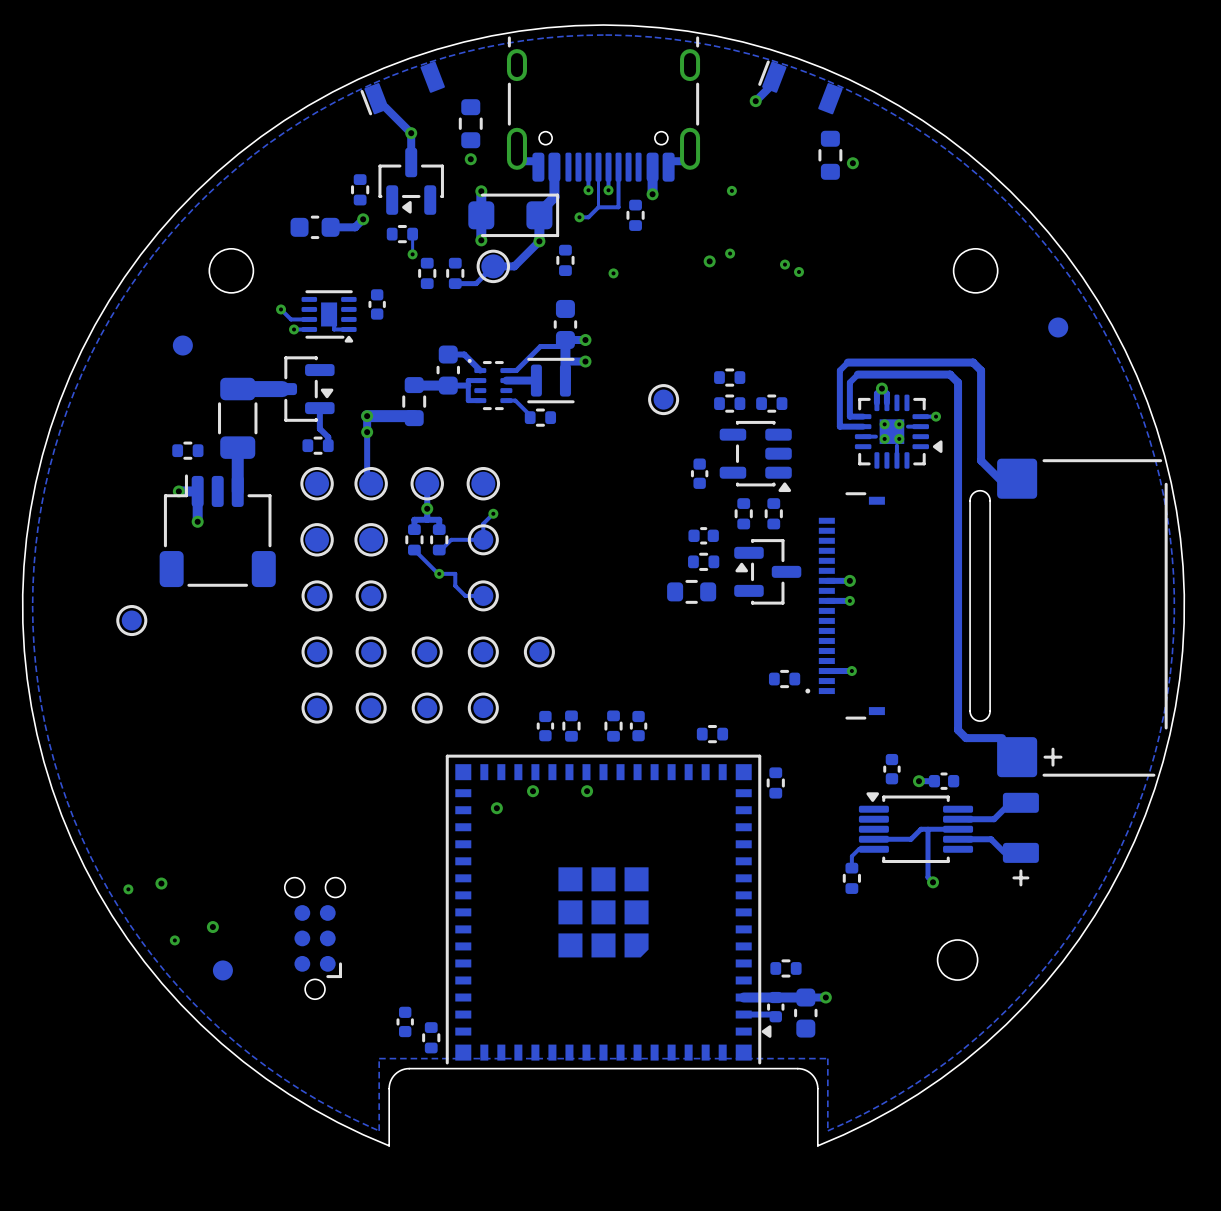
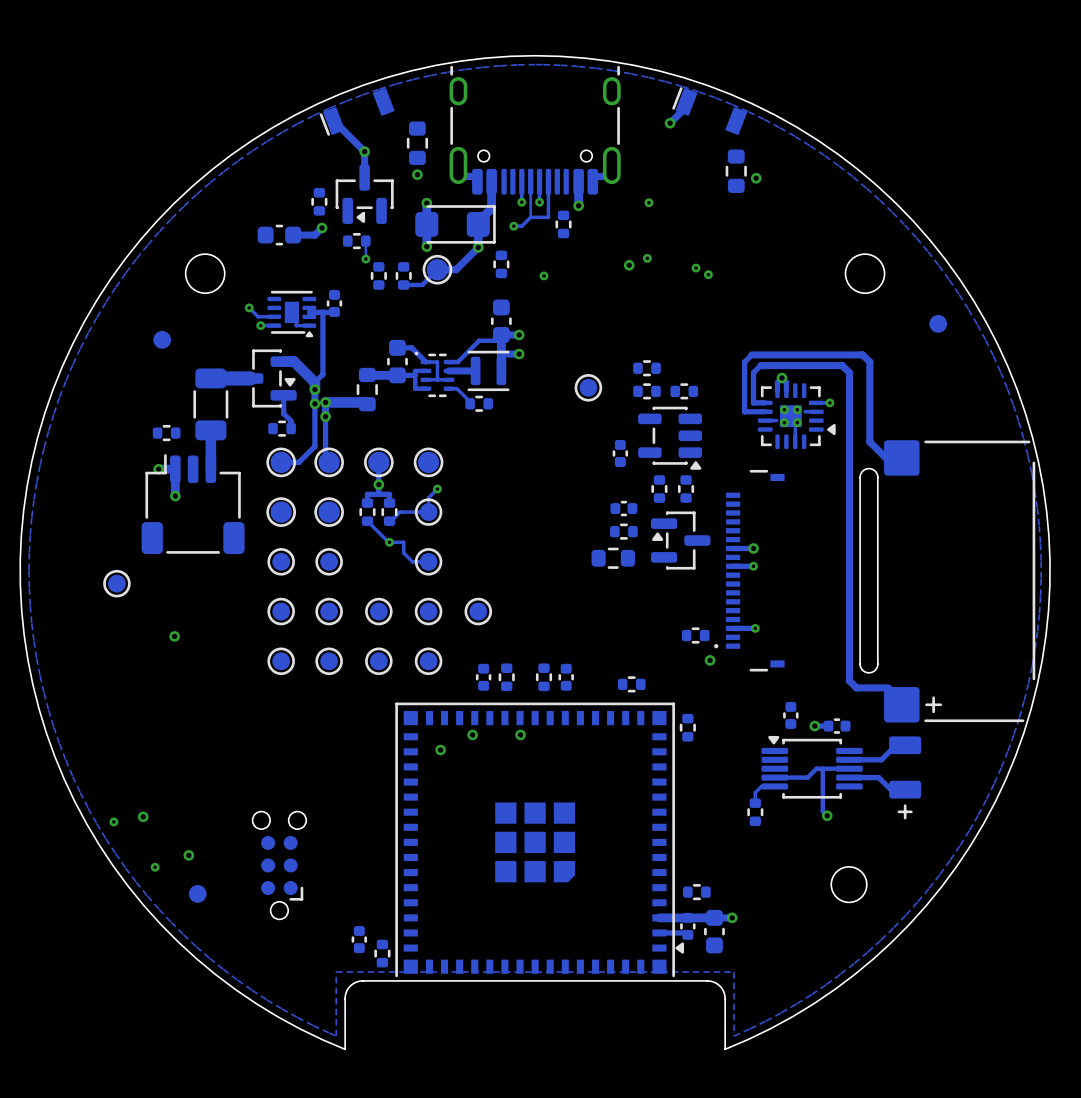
track: none -> (322, 312) (322, 374) (314, 382)
track: none -> (334, 312) (309, 312)
track: none -> (283, 361) (294, 361) (314, 382)
track: none -> (425, 362) (437, 362) (437, 379)
track: none -> (448, 379) (425, 379)
track: none -> (314, 382) (314, 446) (298, 462) (281, 462)
via: none -> (314, 389)
via: none -> (314, 403)
via: none -> (174, 636)
via: none -> (710, 660)

